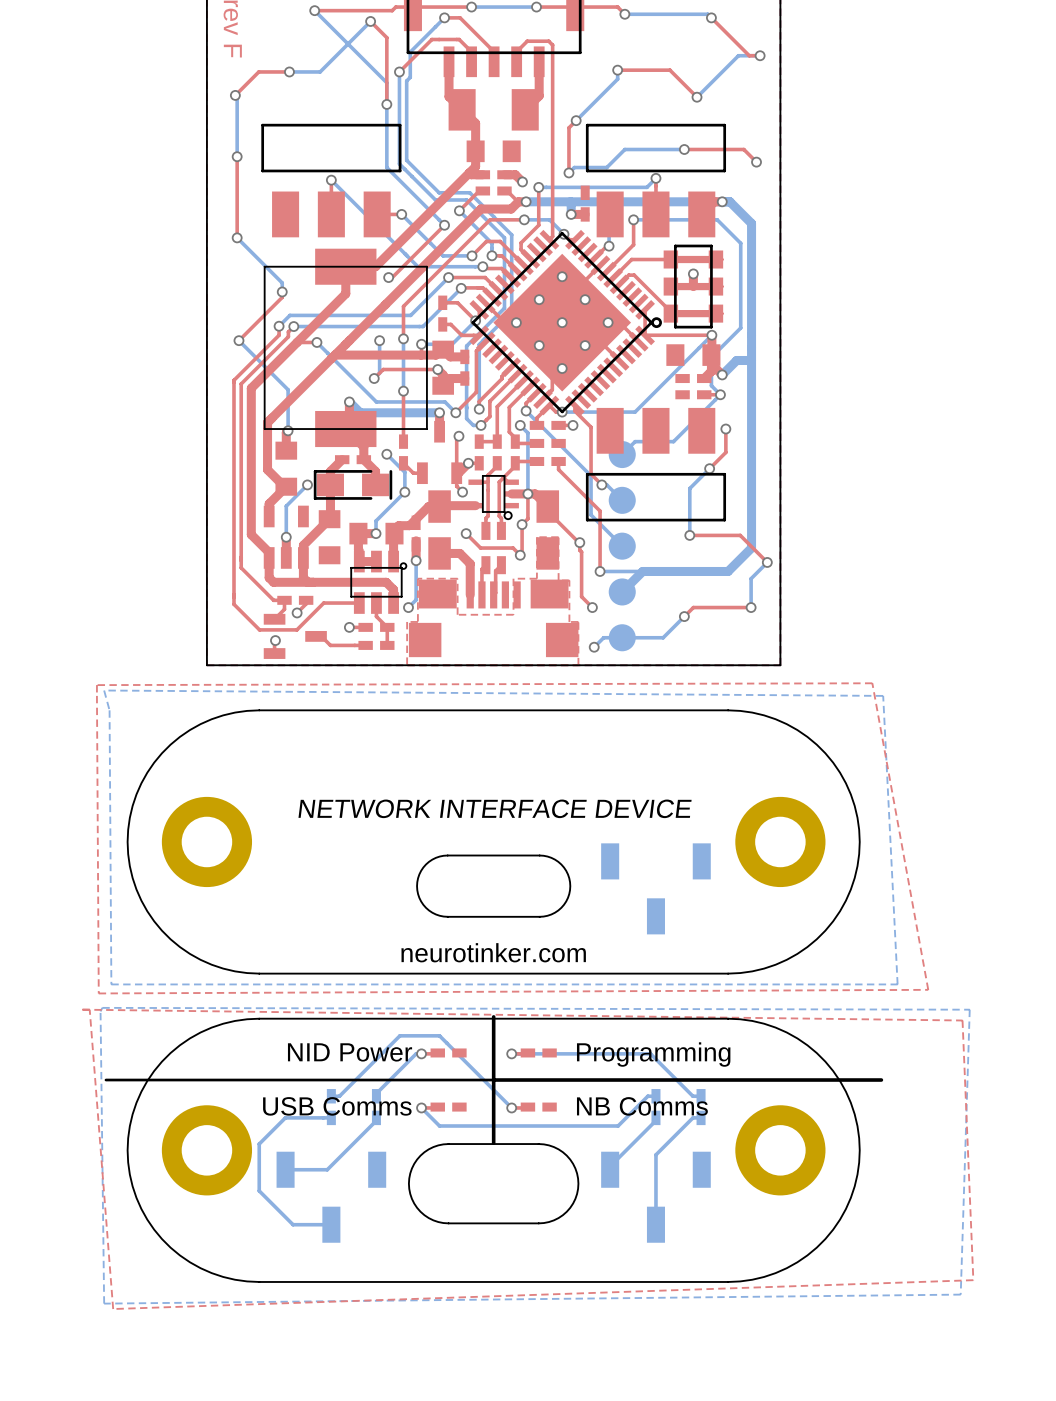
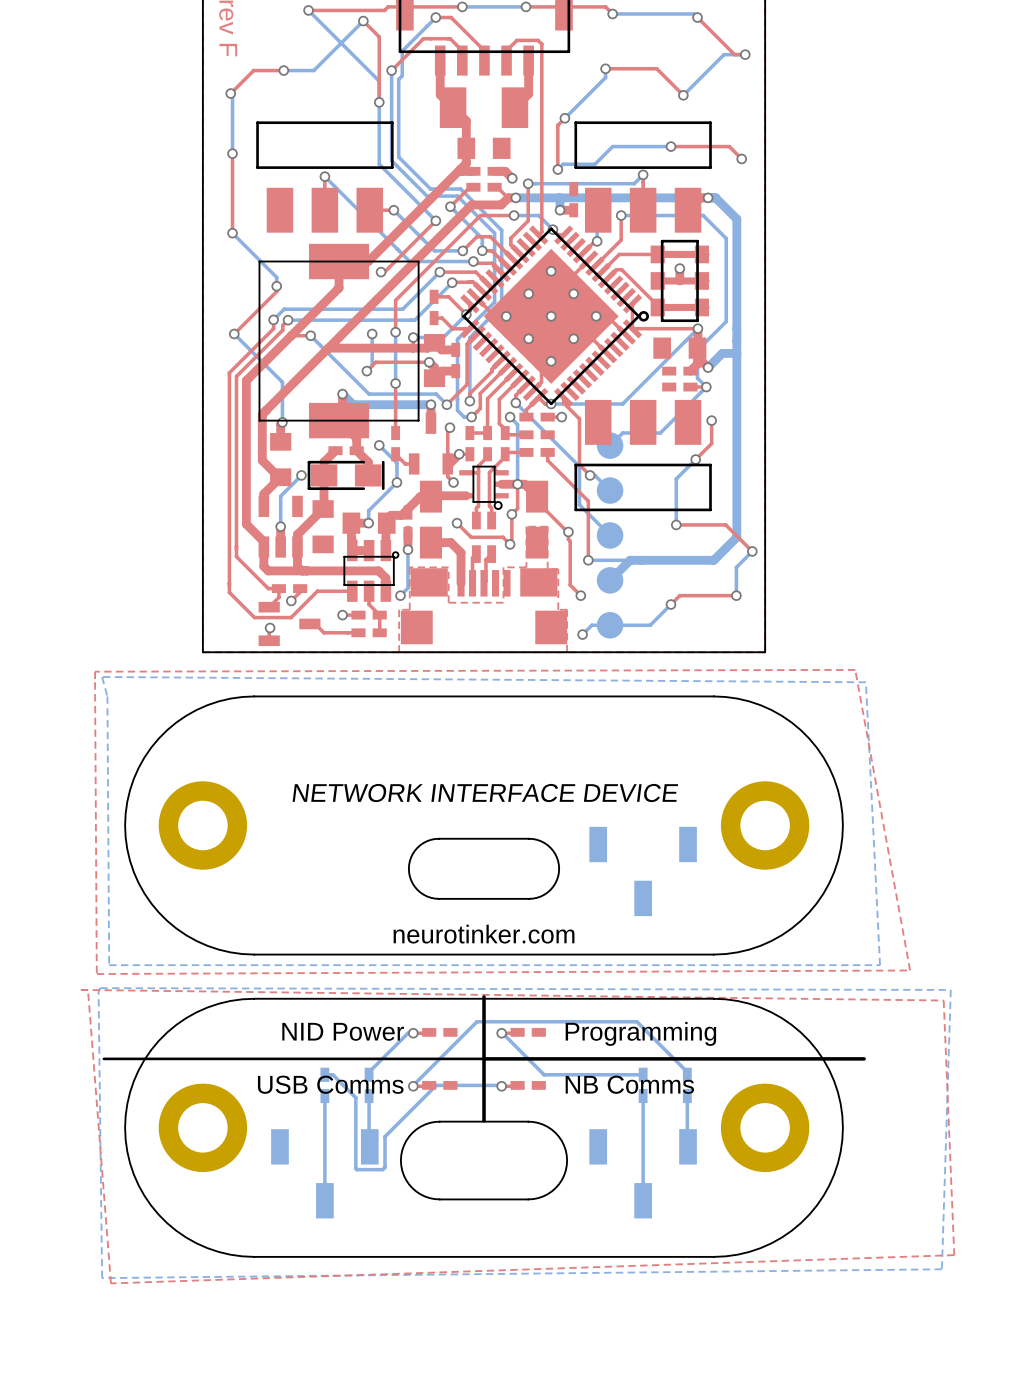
bottom track: (511, 1053) (650, 1053) (692, 1096) (701, 1096) -> (413, 1085) (476, 1021) (636, 1021) (687, 1072) (687, 1074)
bottom track: (339, 1096) (399, 1035) (439, 1035) (511, 1107) -> (332, 1074) (355, 1097) (356, 1169) (382, 1169) (385, 1167) (385, 1136) (436, 1085) (501, 1085)
bottom track: (647, 1096) (618, 1126) (439, 1126) (421, 1107) -> (635, 1074) (544, 1074) (501, 1032)
bottom track: (331, 1117) (285, 1117) (259, 1144) (259, 1190) (293, 1224) (331, 1224) -> (324, 1096) (324, 1200)
bottom track: (701, 1117) (692, 1117) (655, 1154) -> (643, 1098) (643, 1132)
bottom track: none -> (687, 1096) (688, 1146)
bottom track: (376, 1120) (327, 1169) (285, 1169) -> (369, 1098) (369, 1146)
bottom track: (655, 1120) (610, 1166) (610, 1169) -> none

